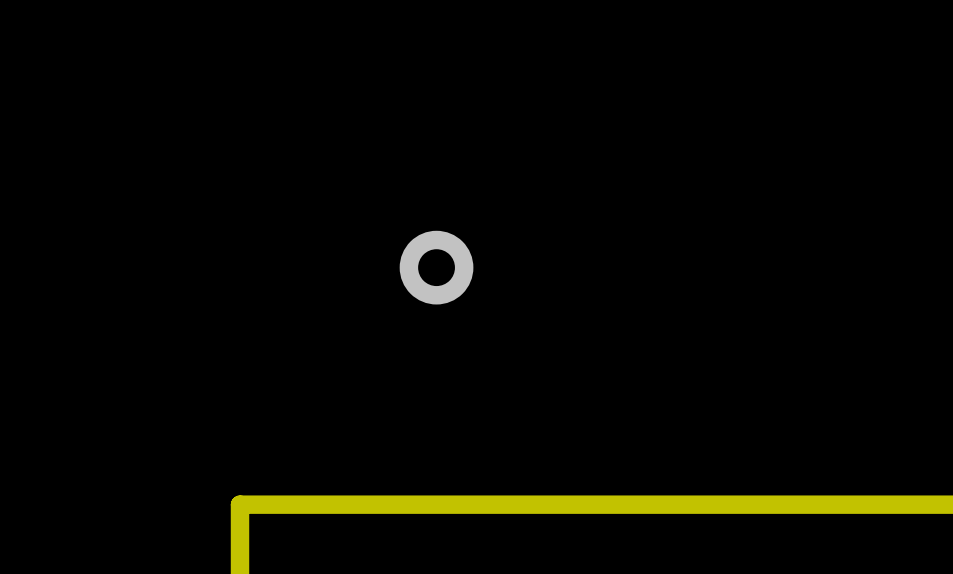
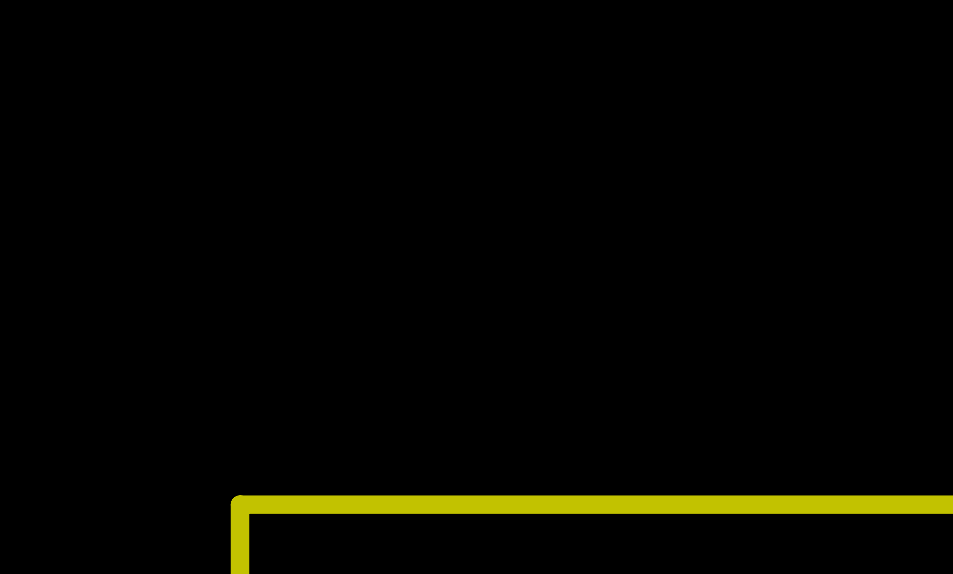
via: (436, 267) -> none

